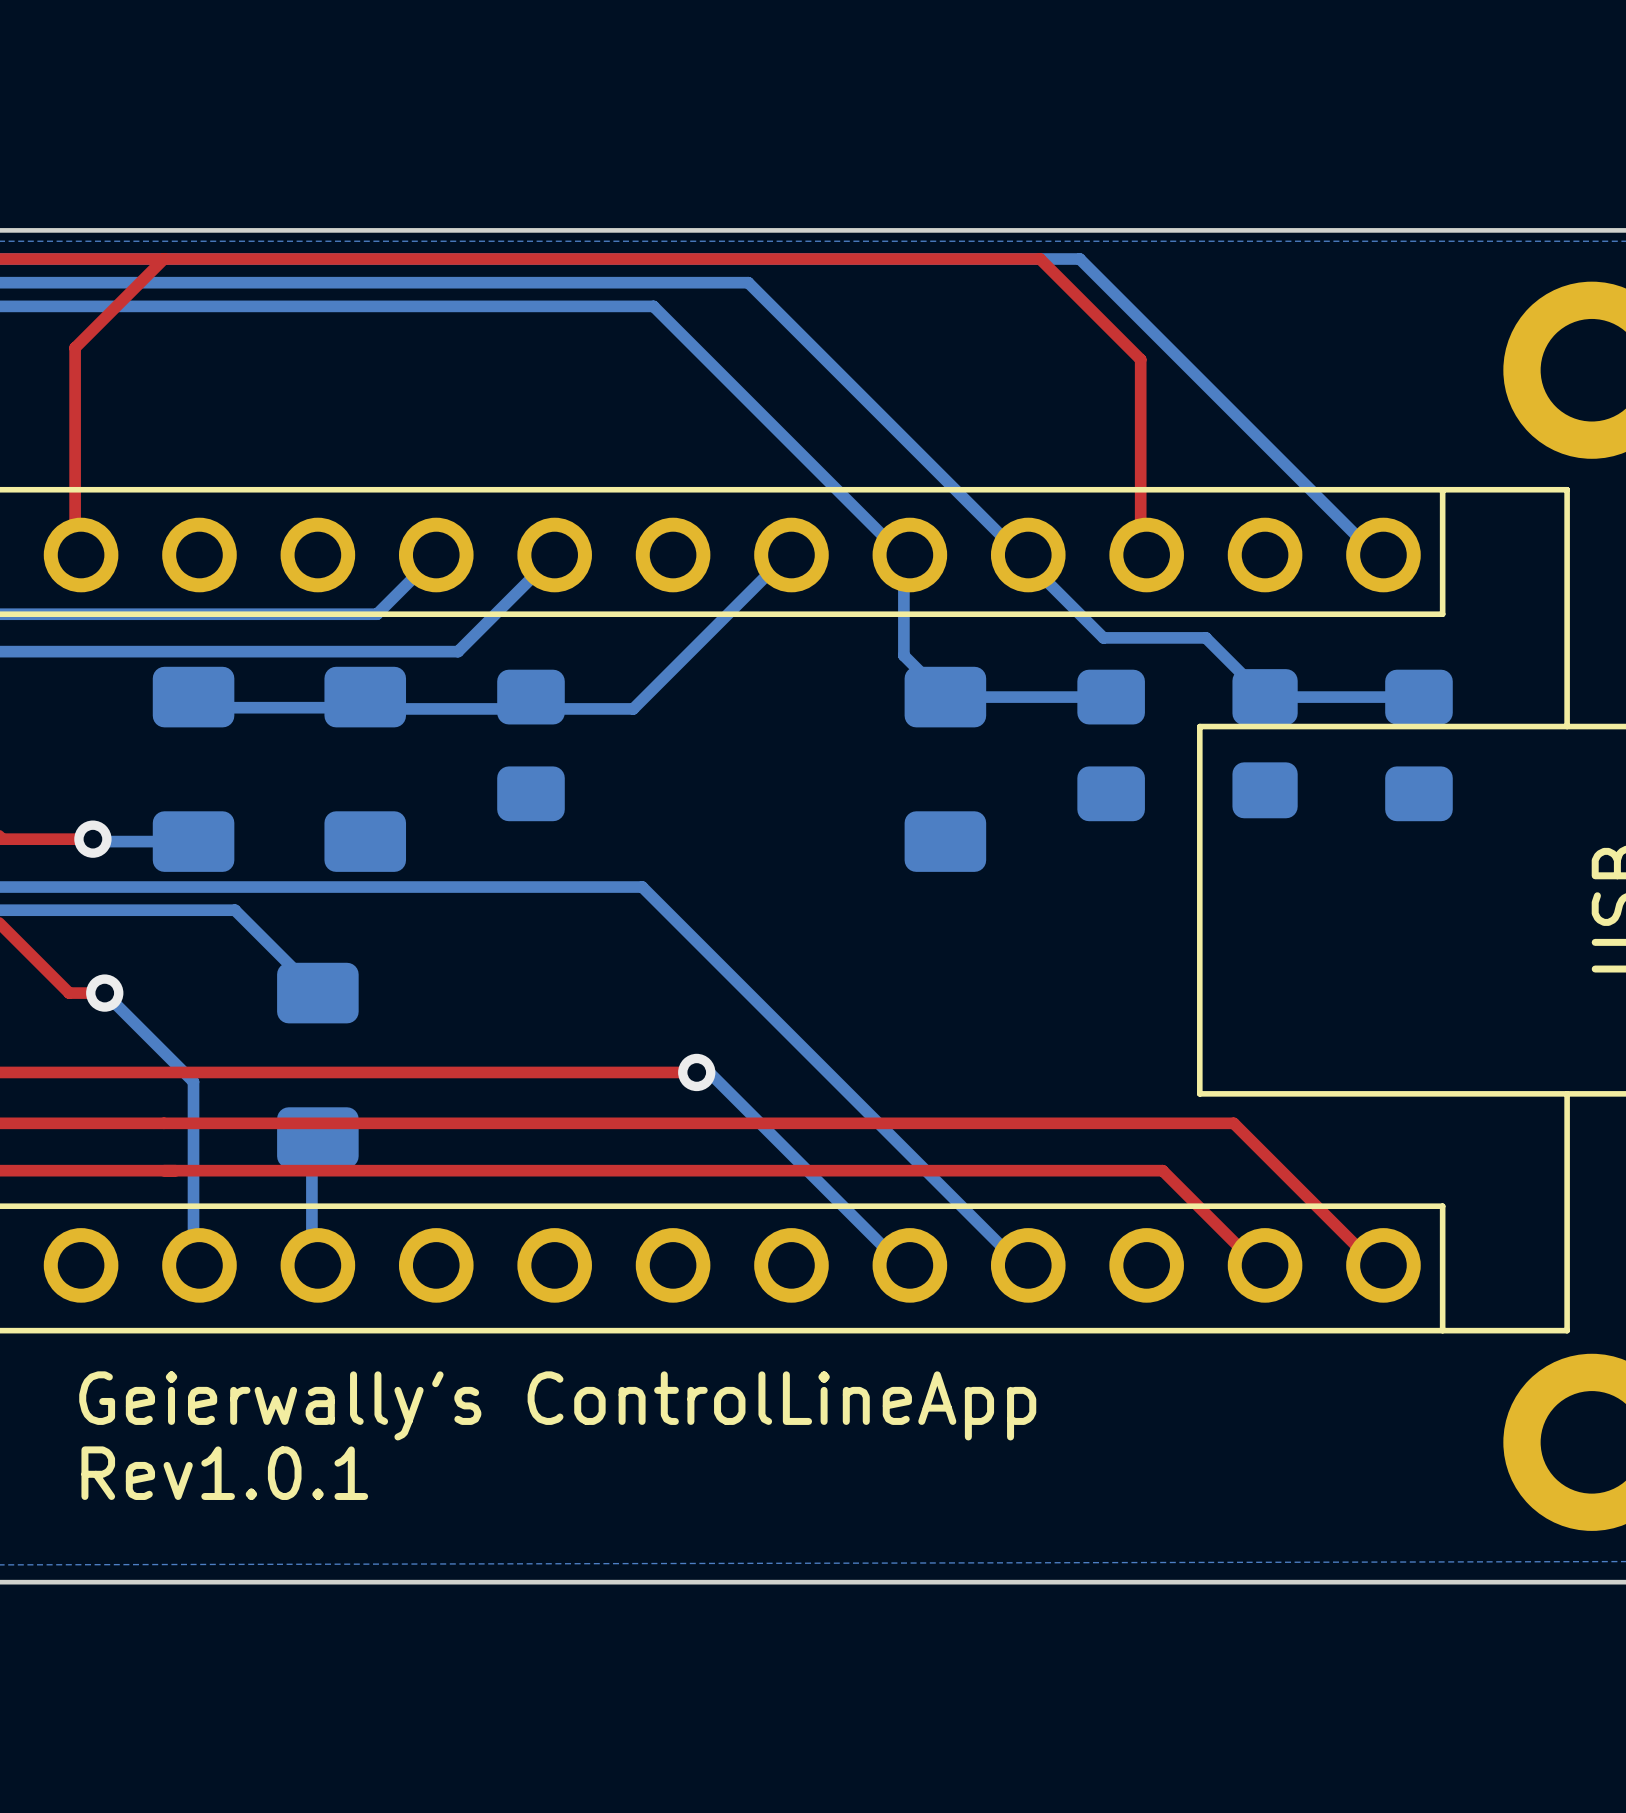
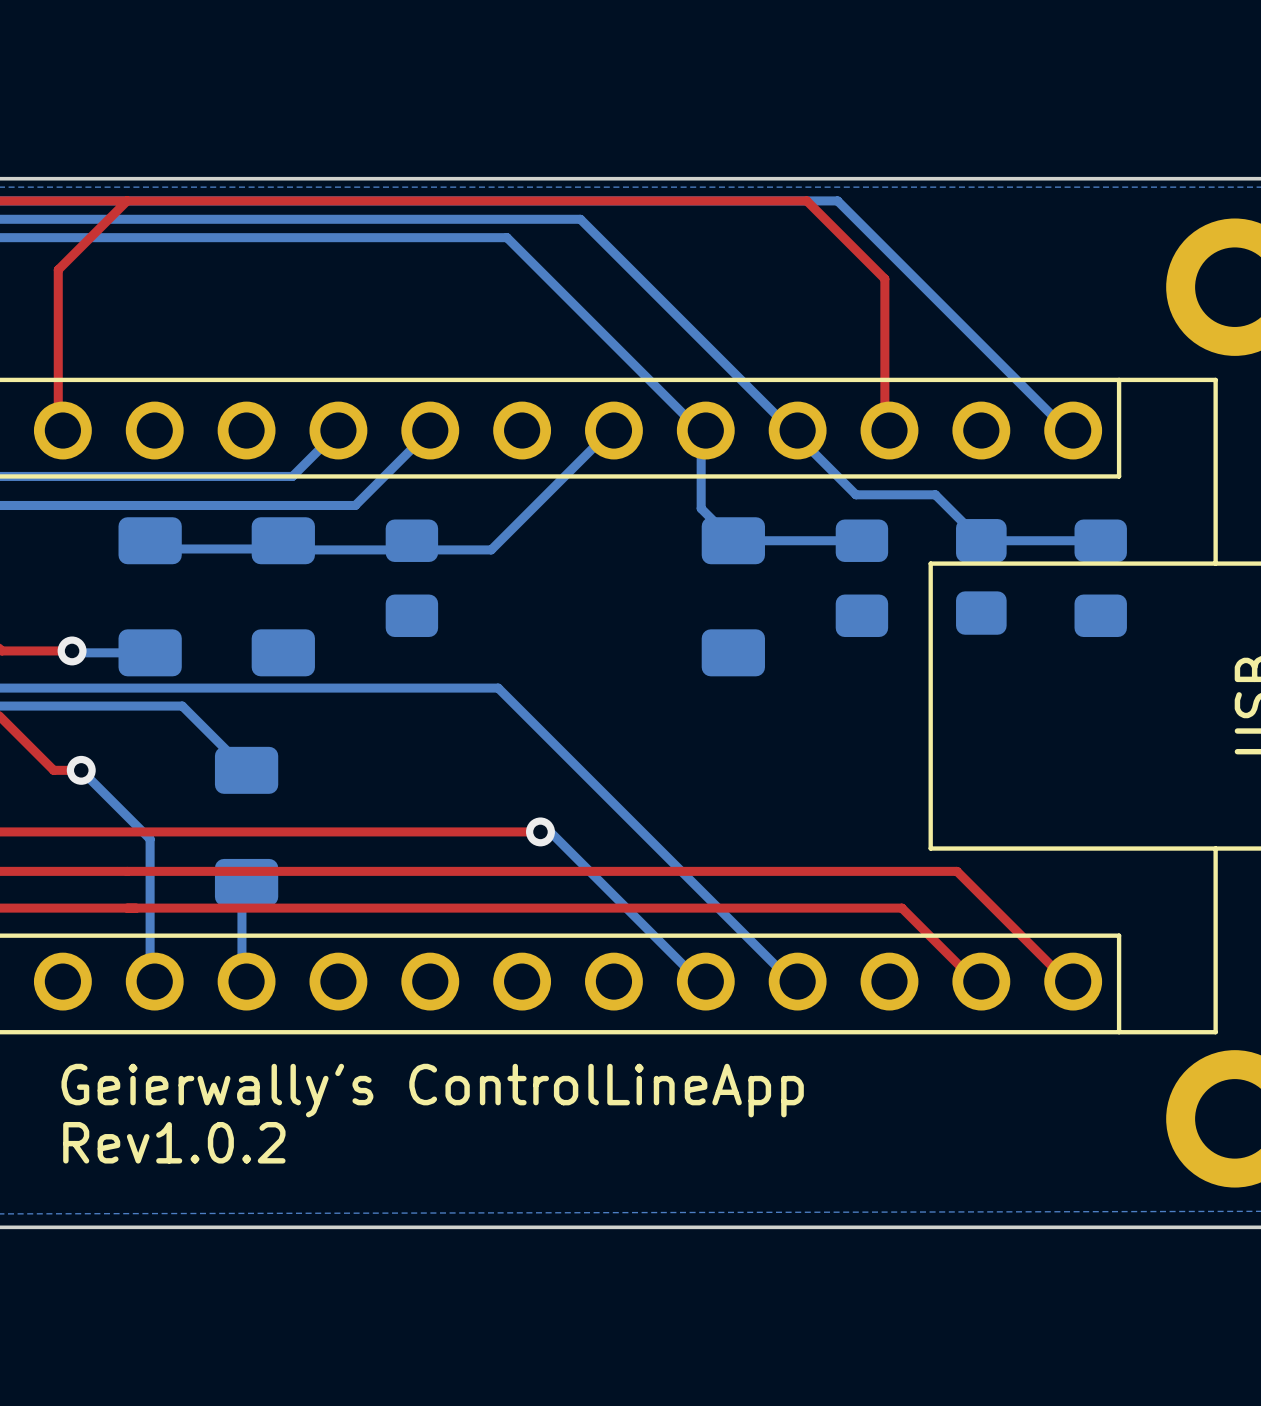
text: Rev1.0.1 (224, 1473) -> Rev1.0.2 (174, 1142)

